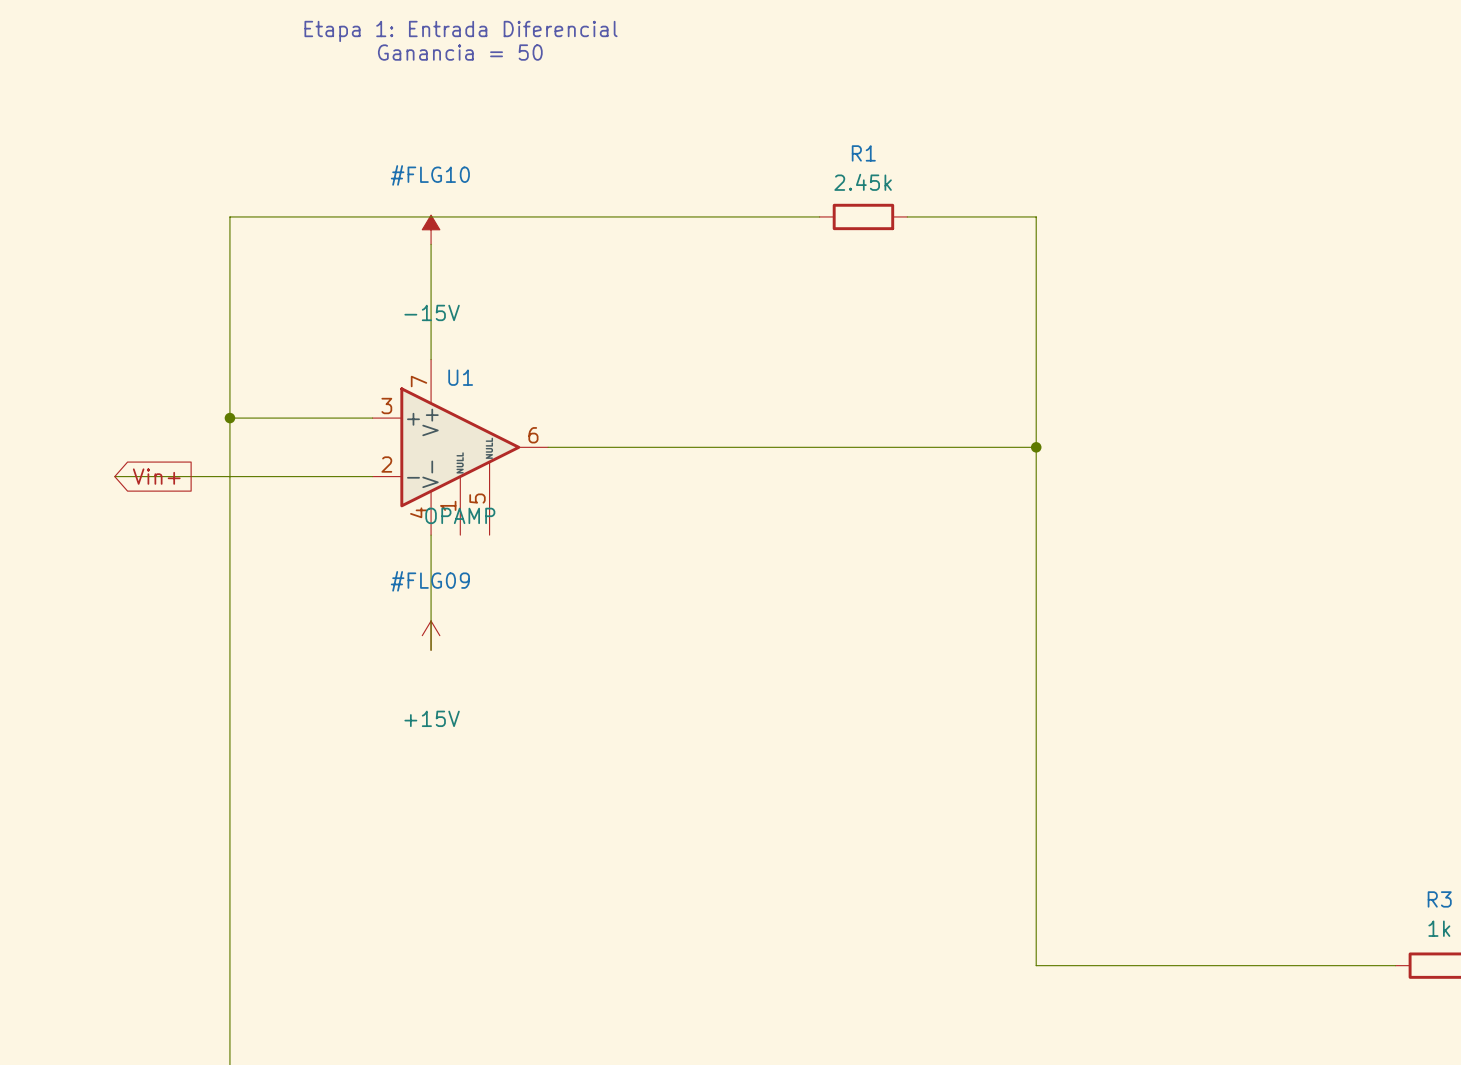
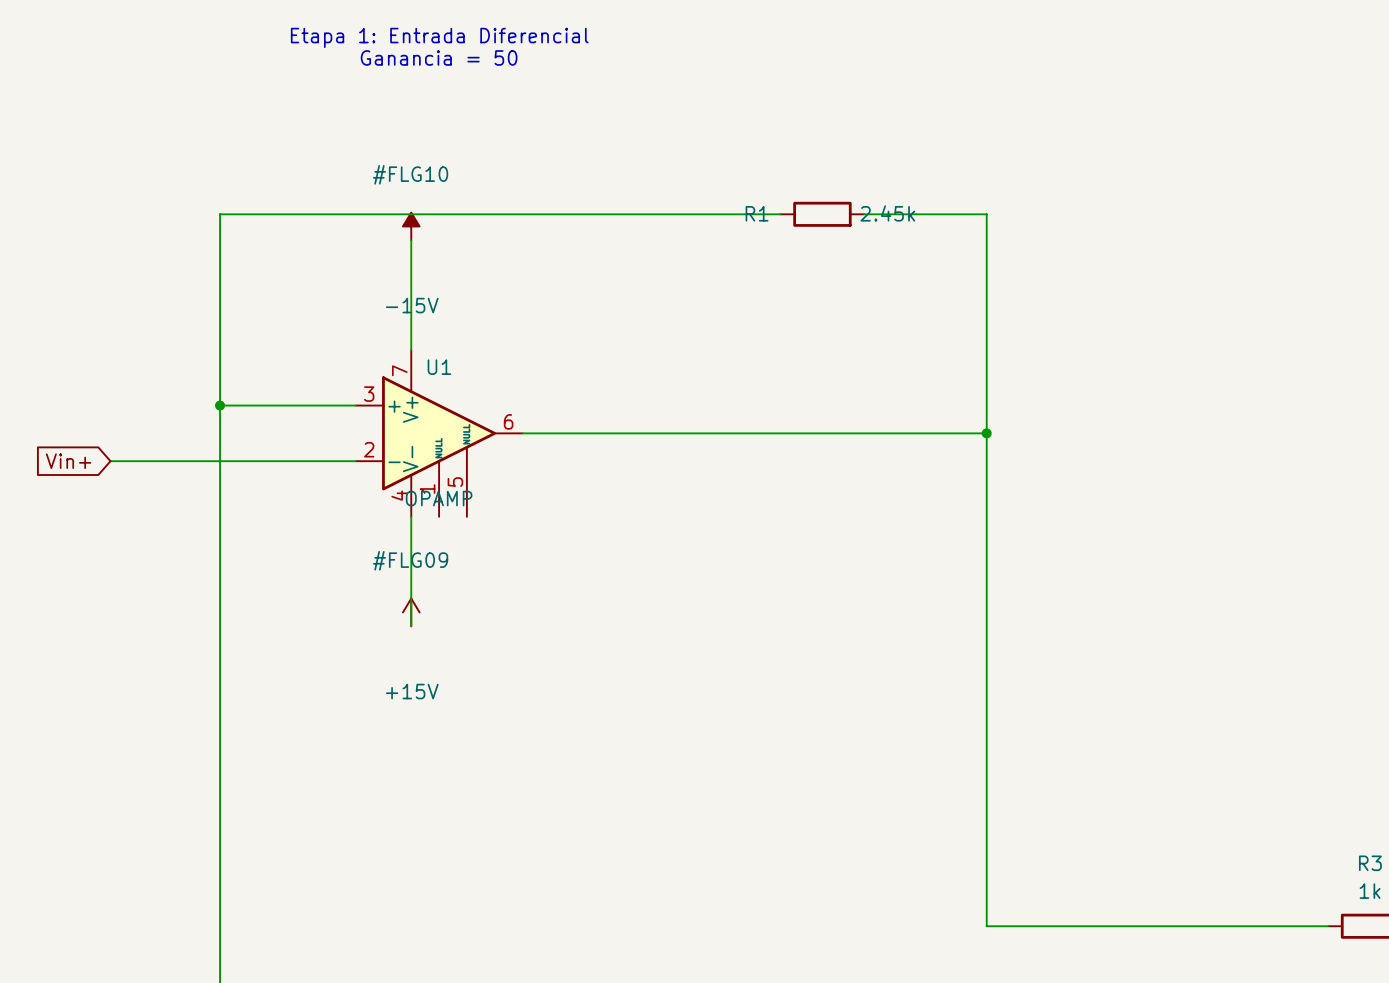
R1 name position: R1 (863, 153) -> R1 (757, 213)
R1 value position: 2.45k (863, 182) -> 2.45k (887, 213)
global label rotation: 0° (156, 476) -> 180° (68, 461)

